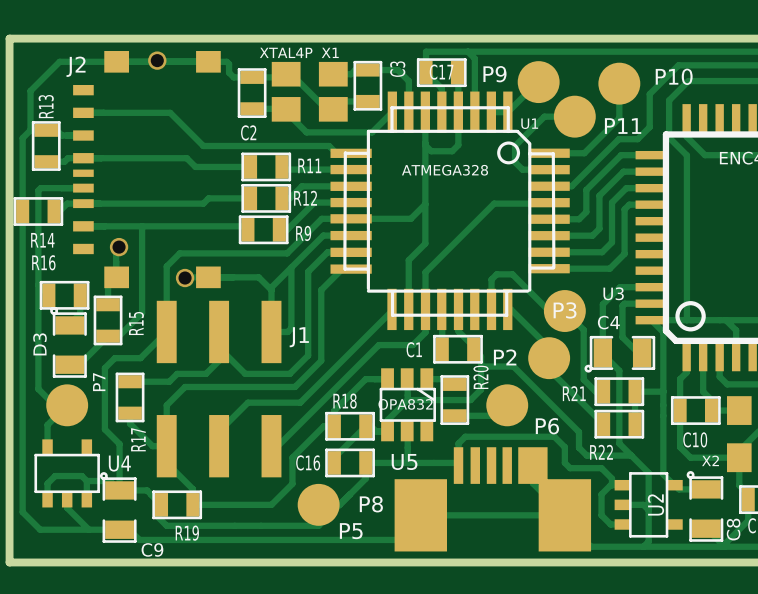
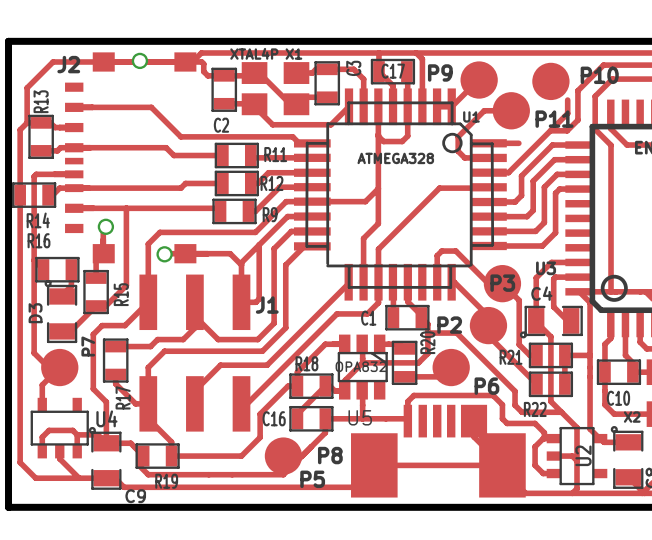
track: none -> (378, 52) (201, 52) (192, 61)
track: (619, 83) (619, 118) (583, 153) -> none
track: none -> (567, 100) (567, 113) (550, 130)

